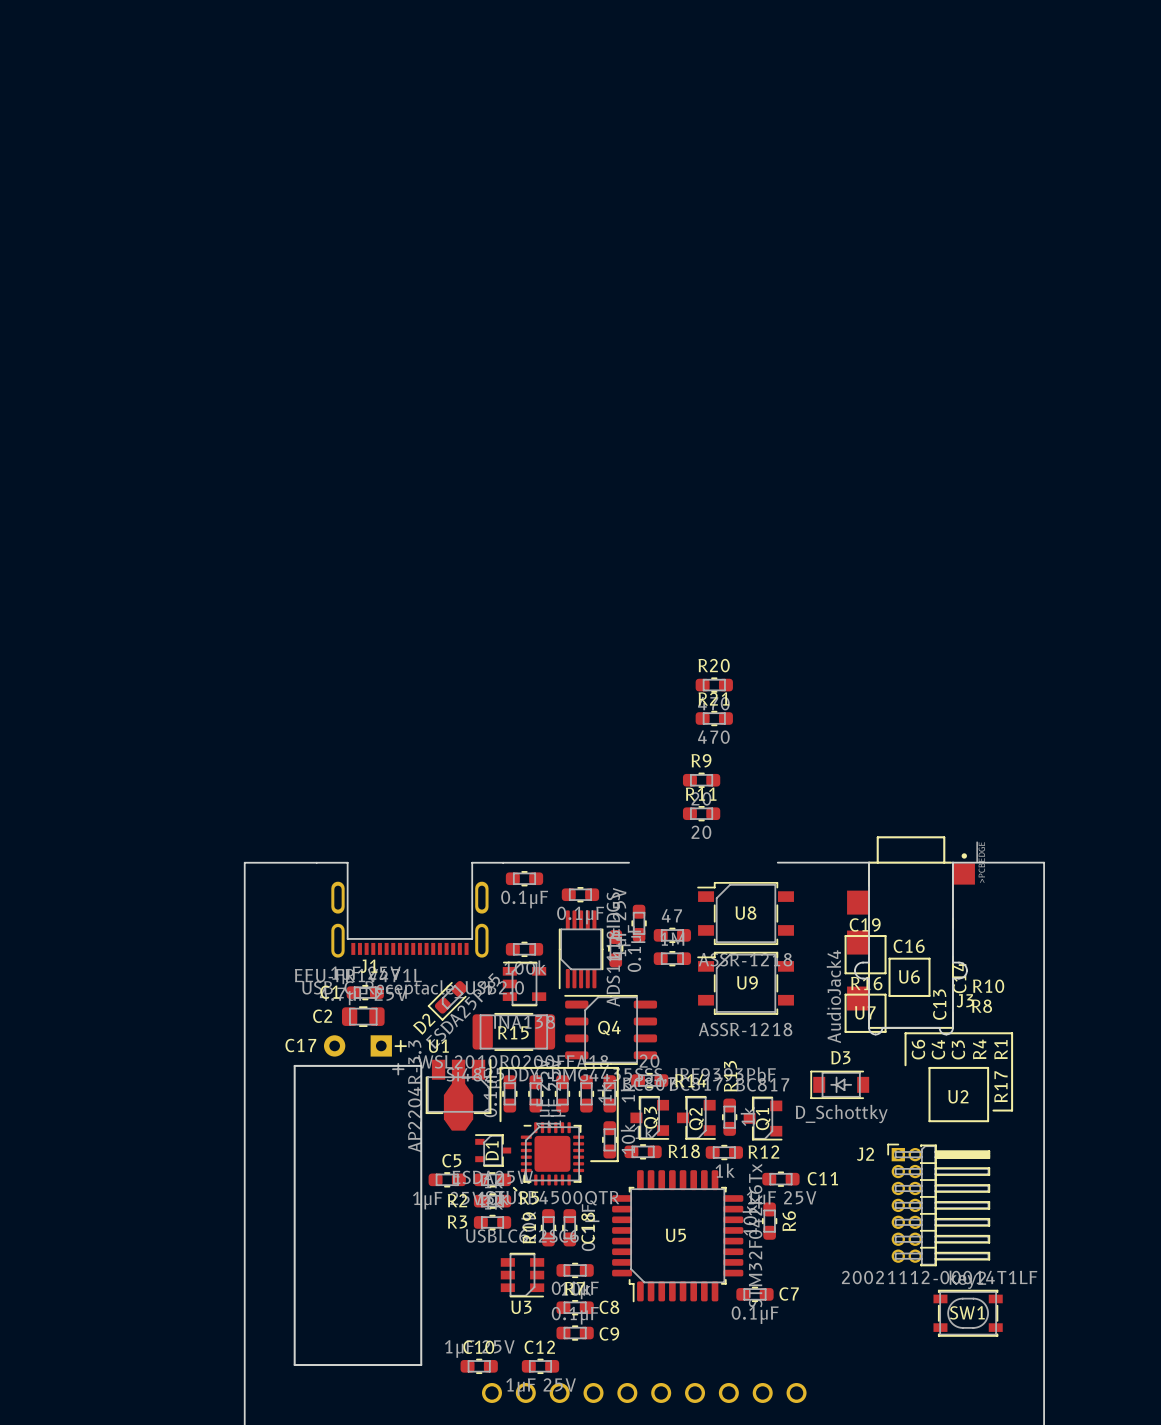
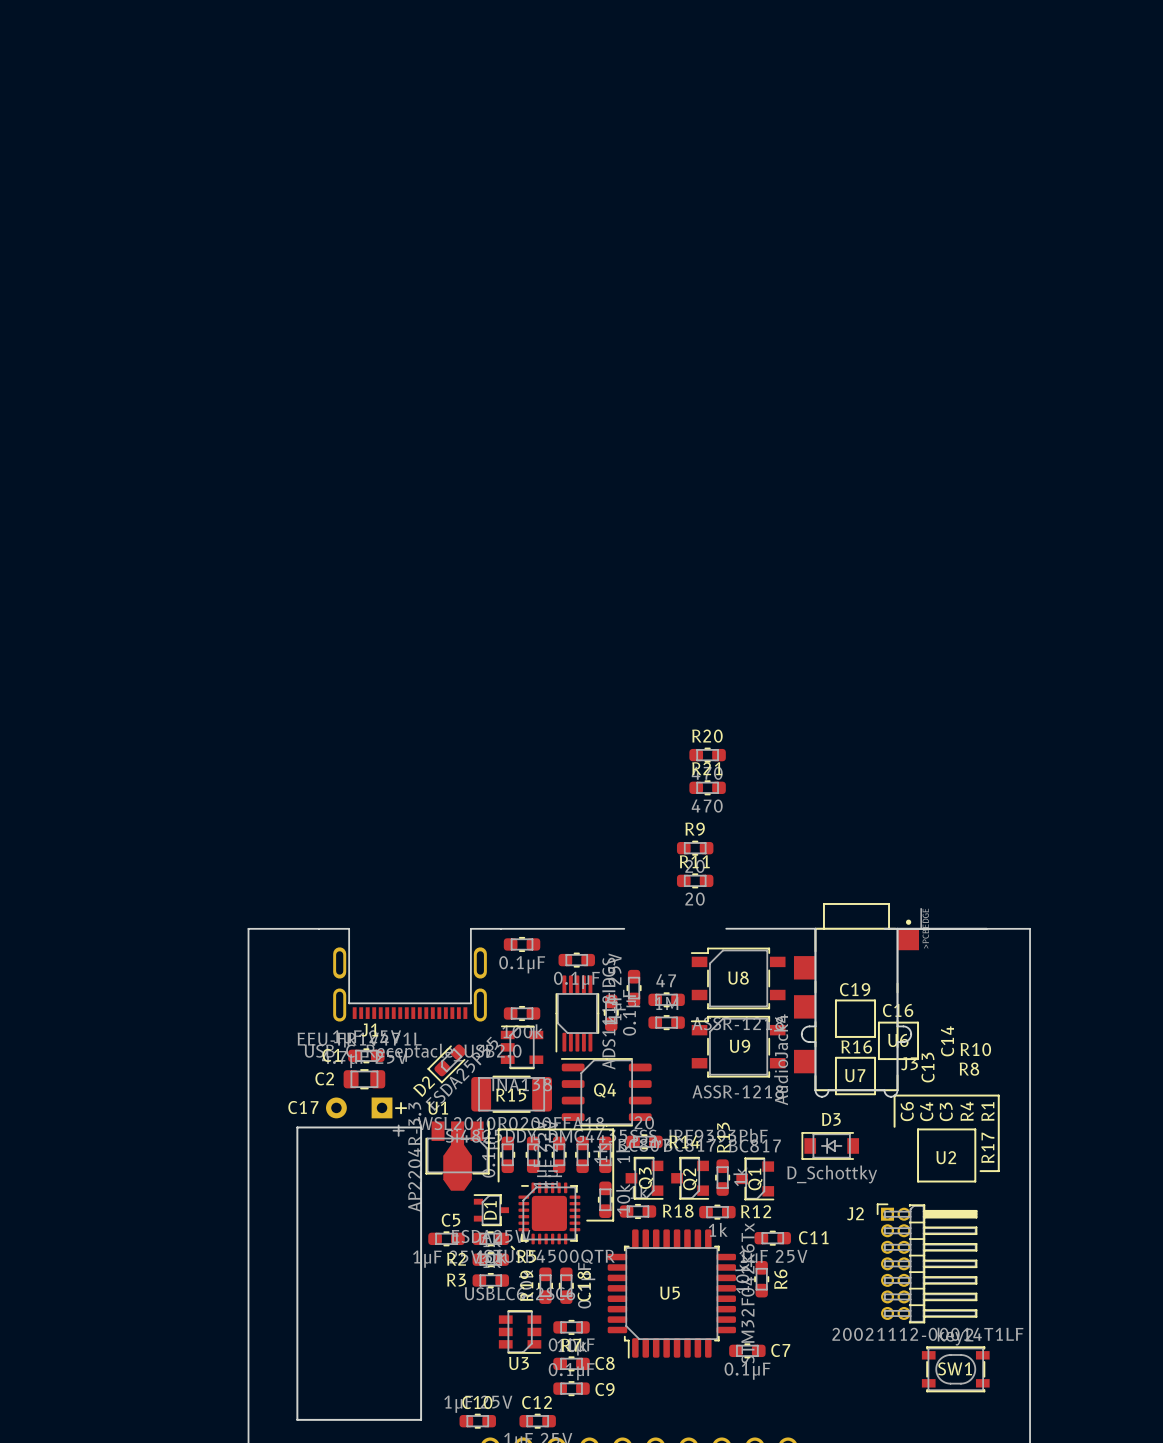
board edge: none -> (884, 928) (1030, 928)
J3 position: (911, 935) -> (856, 999)

